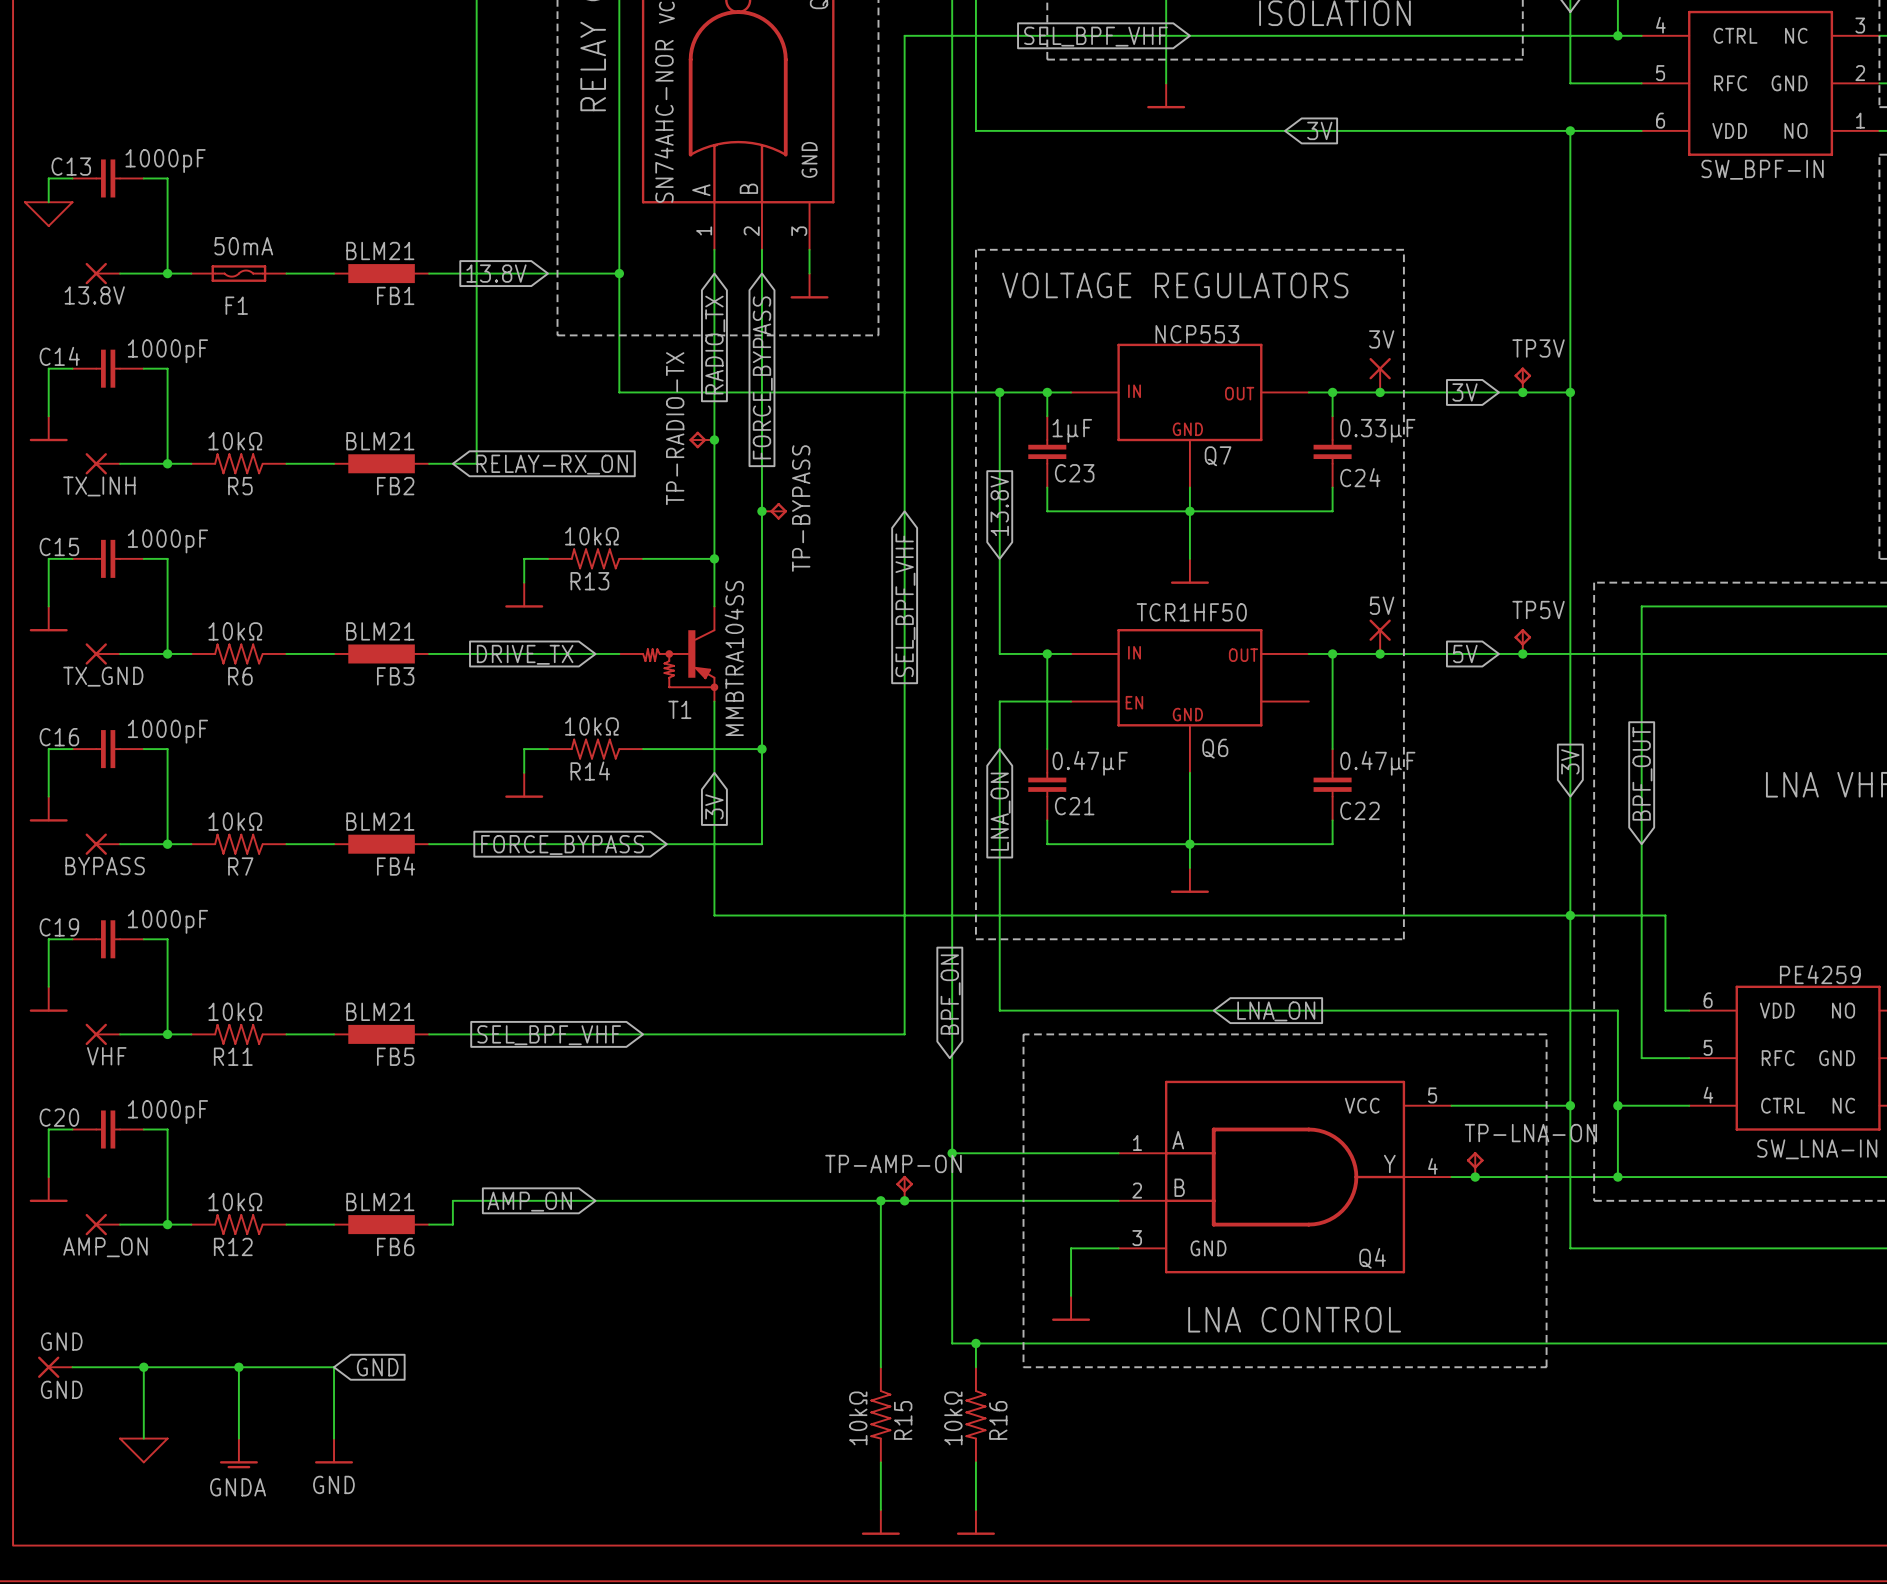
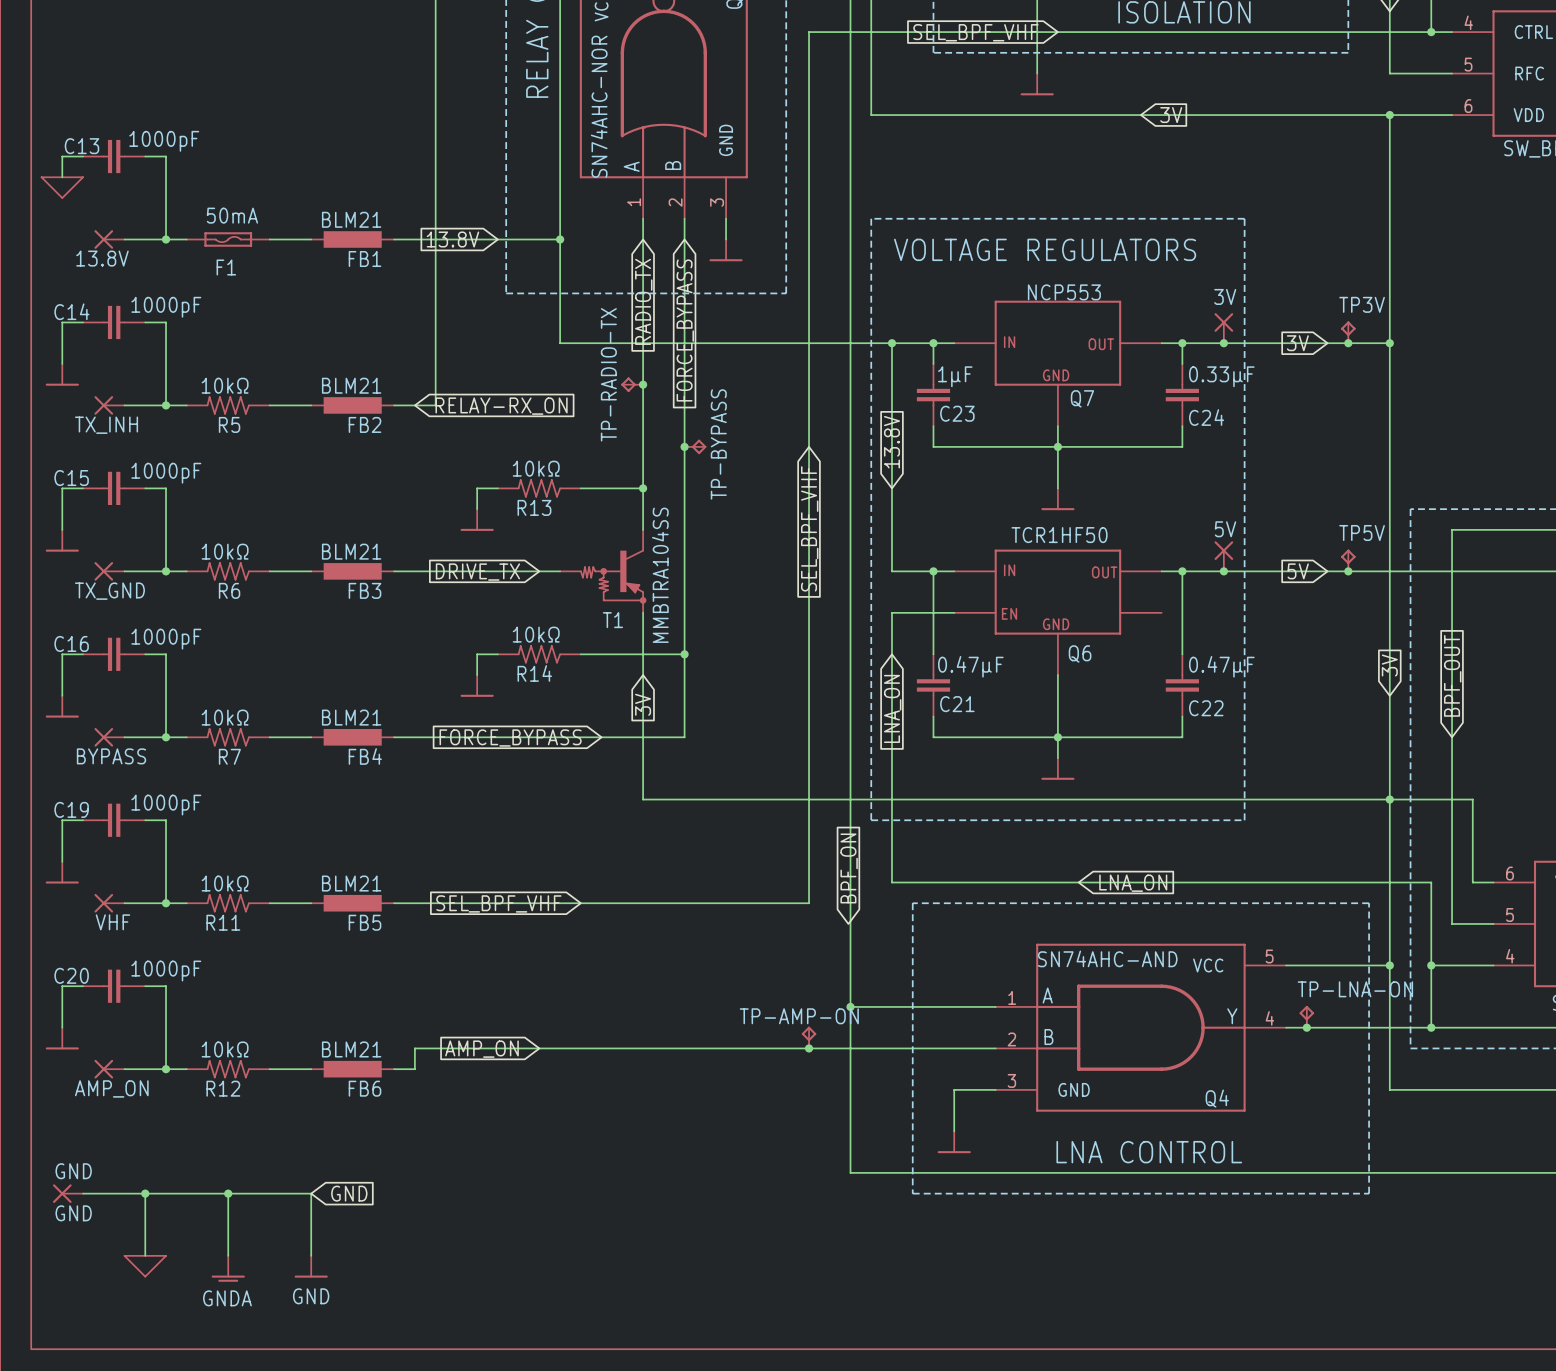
Q4 value: none -> SN74AHC-AND (1107, 958)
wire: (880, 1200) (880, 1367) -> none
junction: (880, 1200) -> none
wire: (975, 1343) (975, 1367) -> none
junction: (975, 1343) -> none
R15: 10kΩ (880, 1414) -> none
R16: 10kΩ (975, 1414) -> none
wire: (880, 1462) (880, 1509) -> none
wire: (975, 1462) (975, 1509) -> none
power symbol: (880, 1522) -> none
power symbol: (975, 1522) -> none

